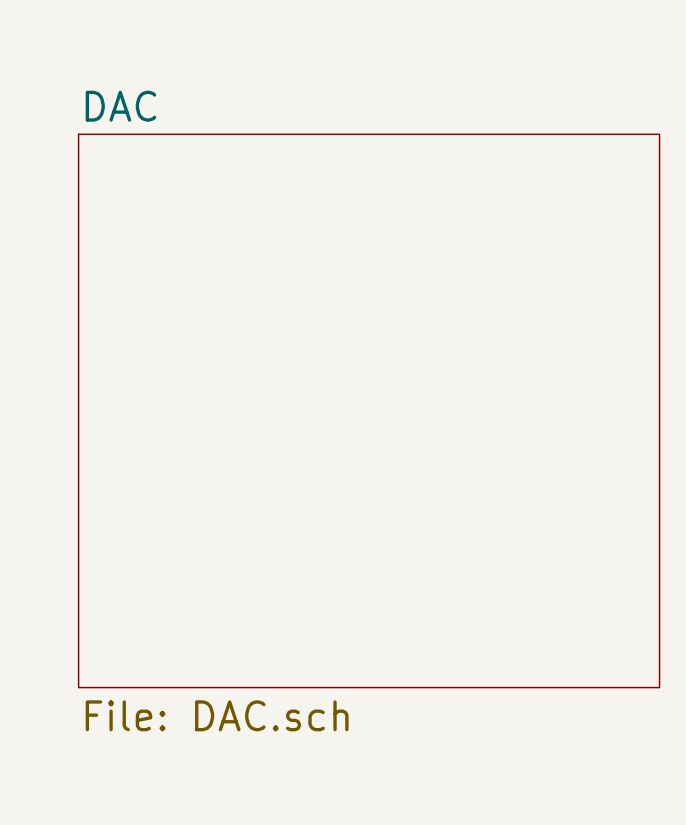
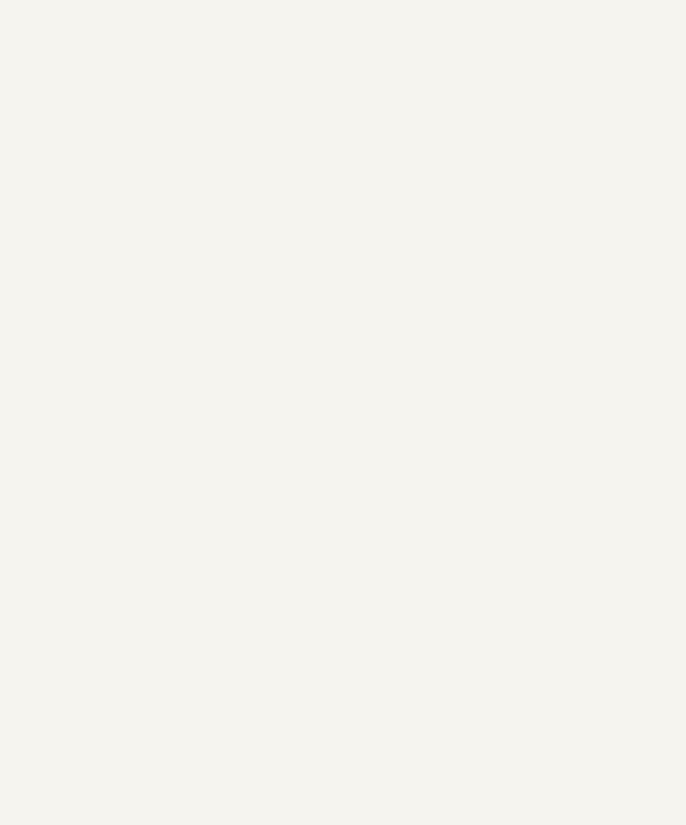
sheet DAC: File: DAC.sch (369, 410) -> none

